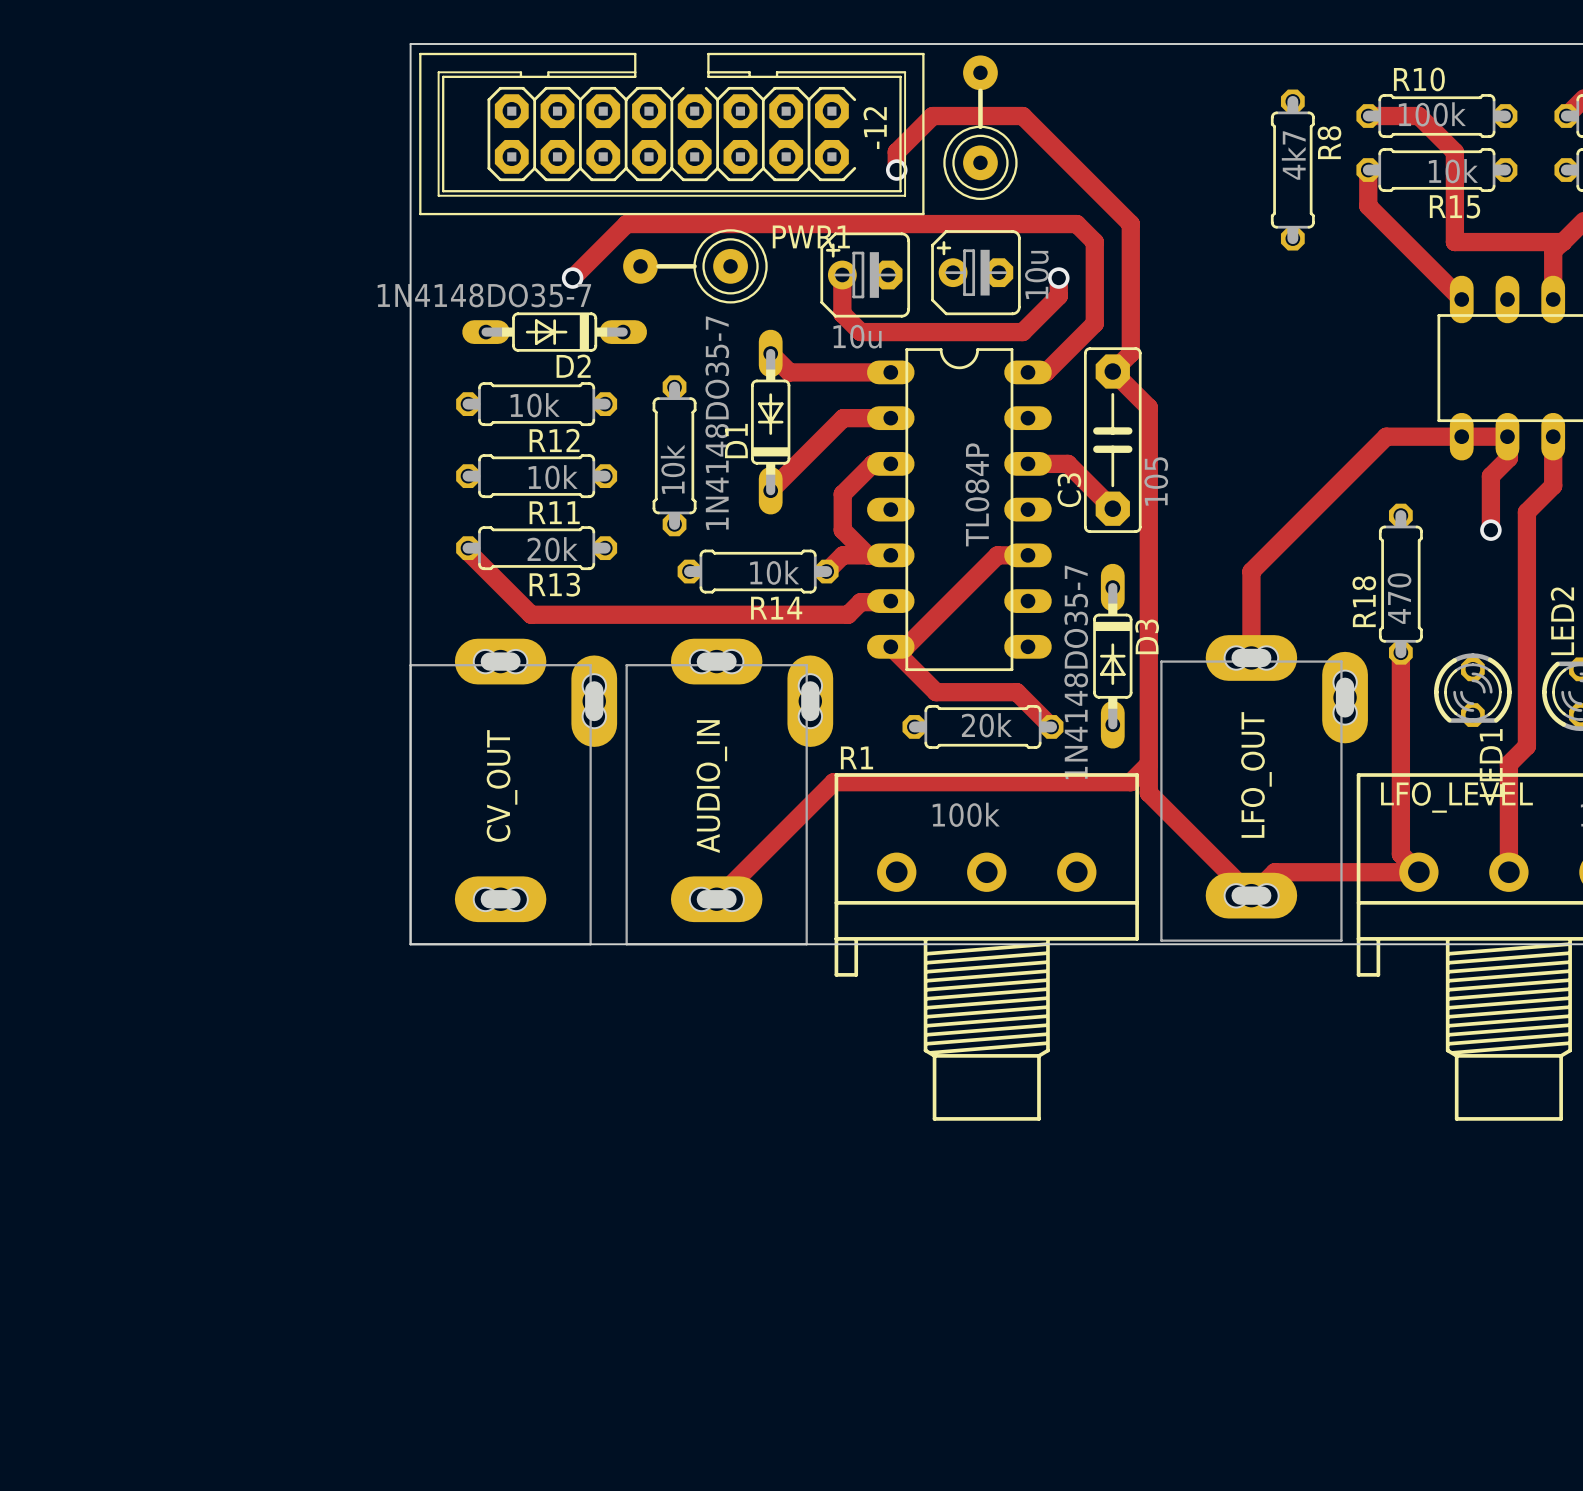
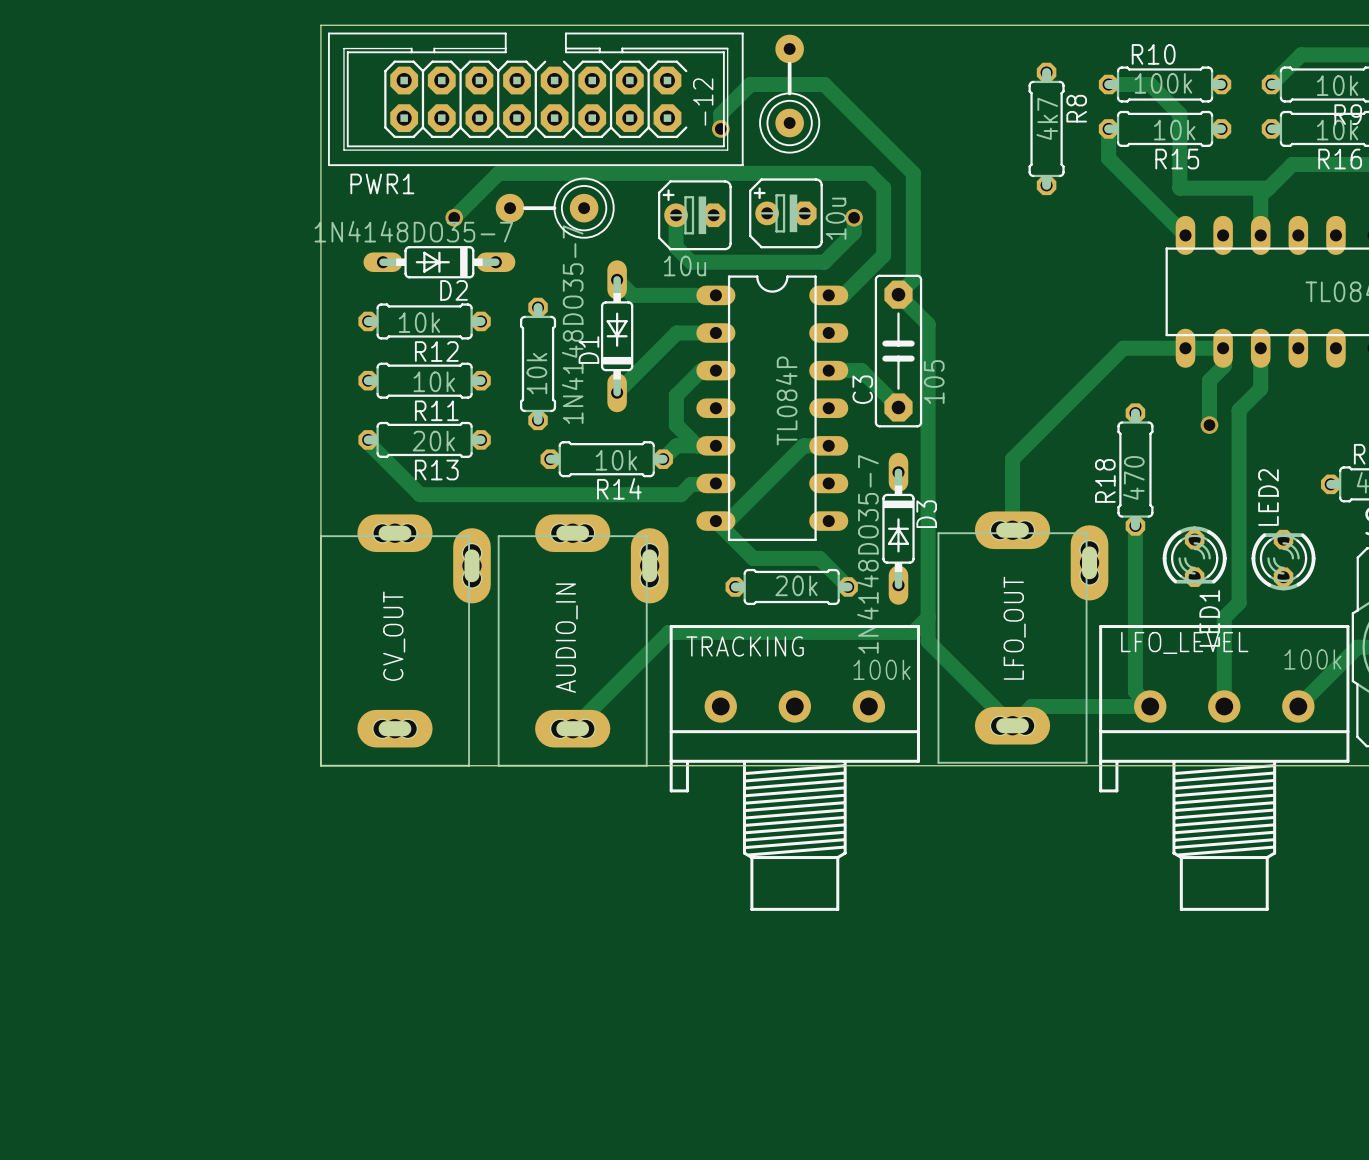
PWR1 name position: PWR1 (811, 236) -> PWR1 (382, 183)
D2 value position: 1N4148DO35-7 (484, 295) -> 1N4148DO35-7 (413, 231)
R1 name: R1 (857, 757) -> TRACKING (745, 646)
R1 value position: 100k (966, 814) -> 100k (882, 669)

